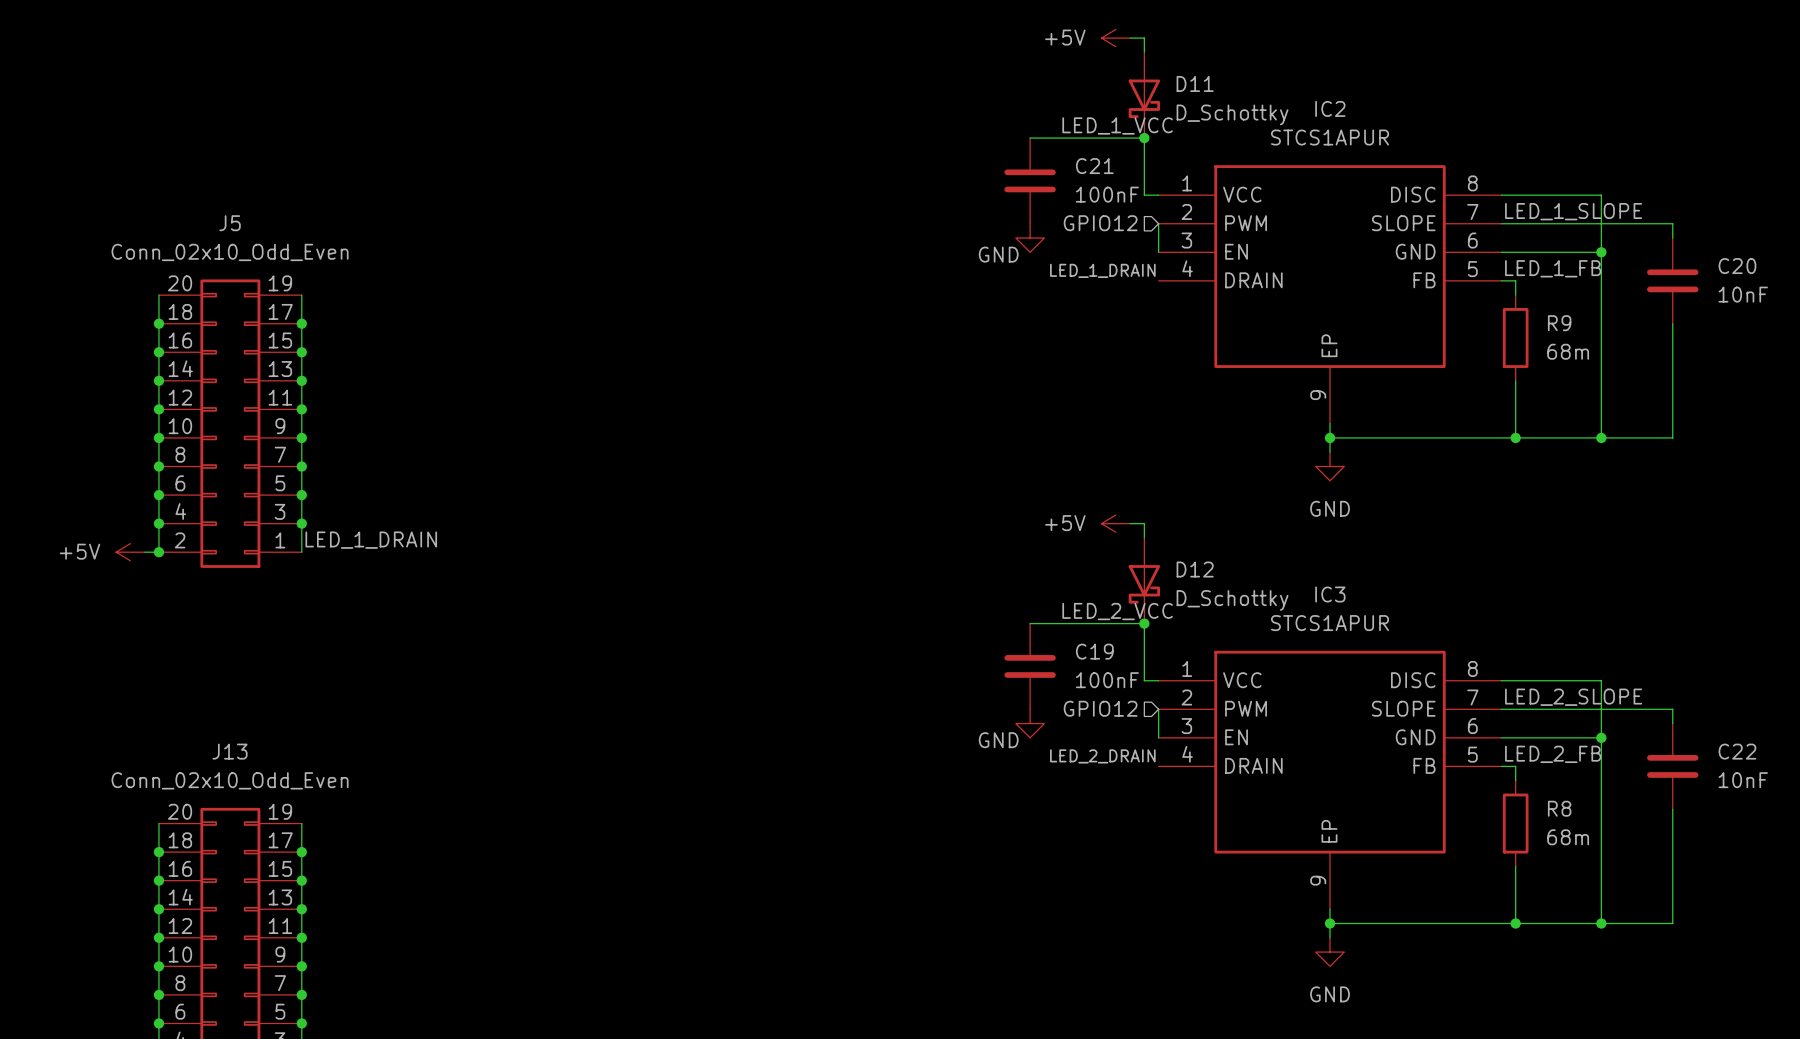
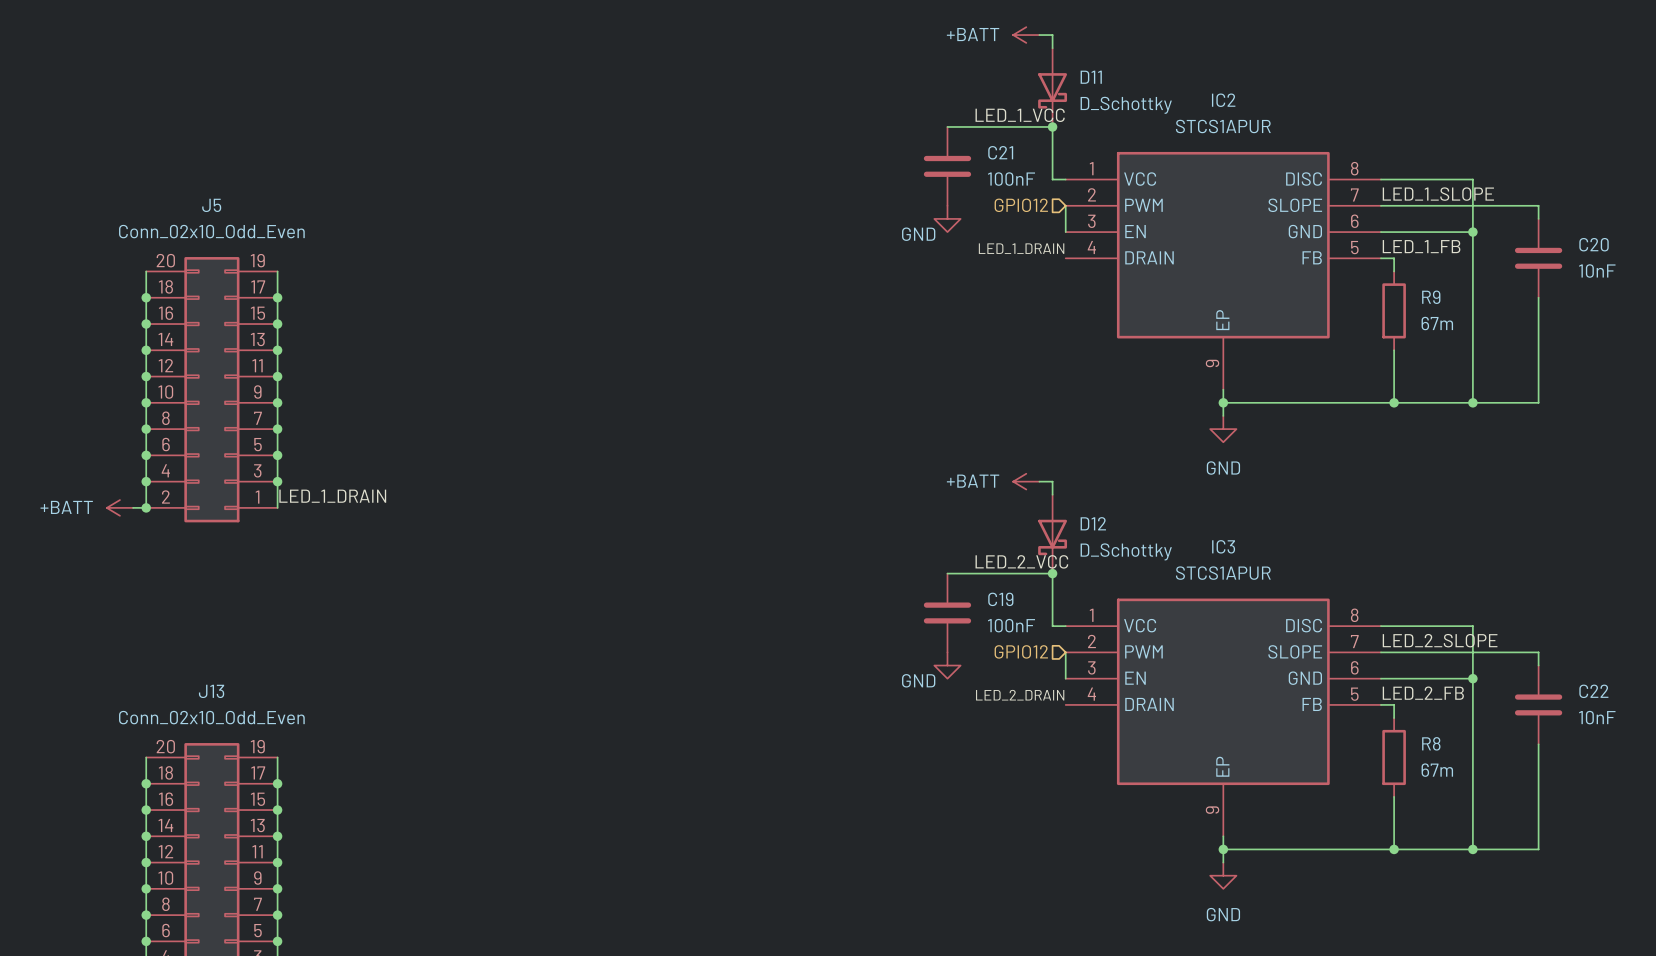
power symbol: +5V (1115, 38) -> +BATT (1026, 35)
R9 value: 68m (1568, 351) -> 67m (1437, 323)
power symbol: +5V (1115, 523) -> +BATT (1026, 481)
power symbol: +5V (130, 552) -> +BATT (119, 507)
R8 value: 68m (1568, 837) -> 67m (1437, 770)

